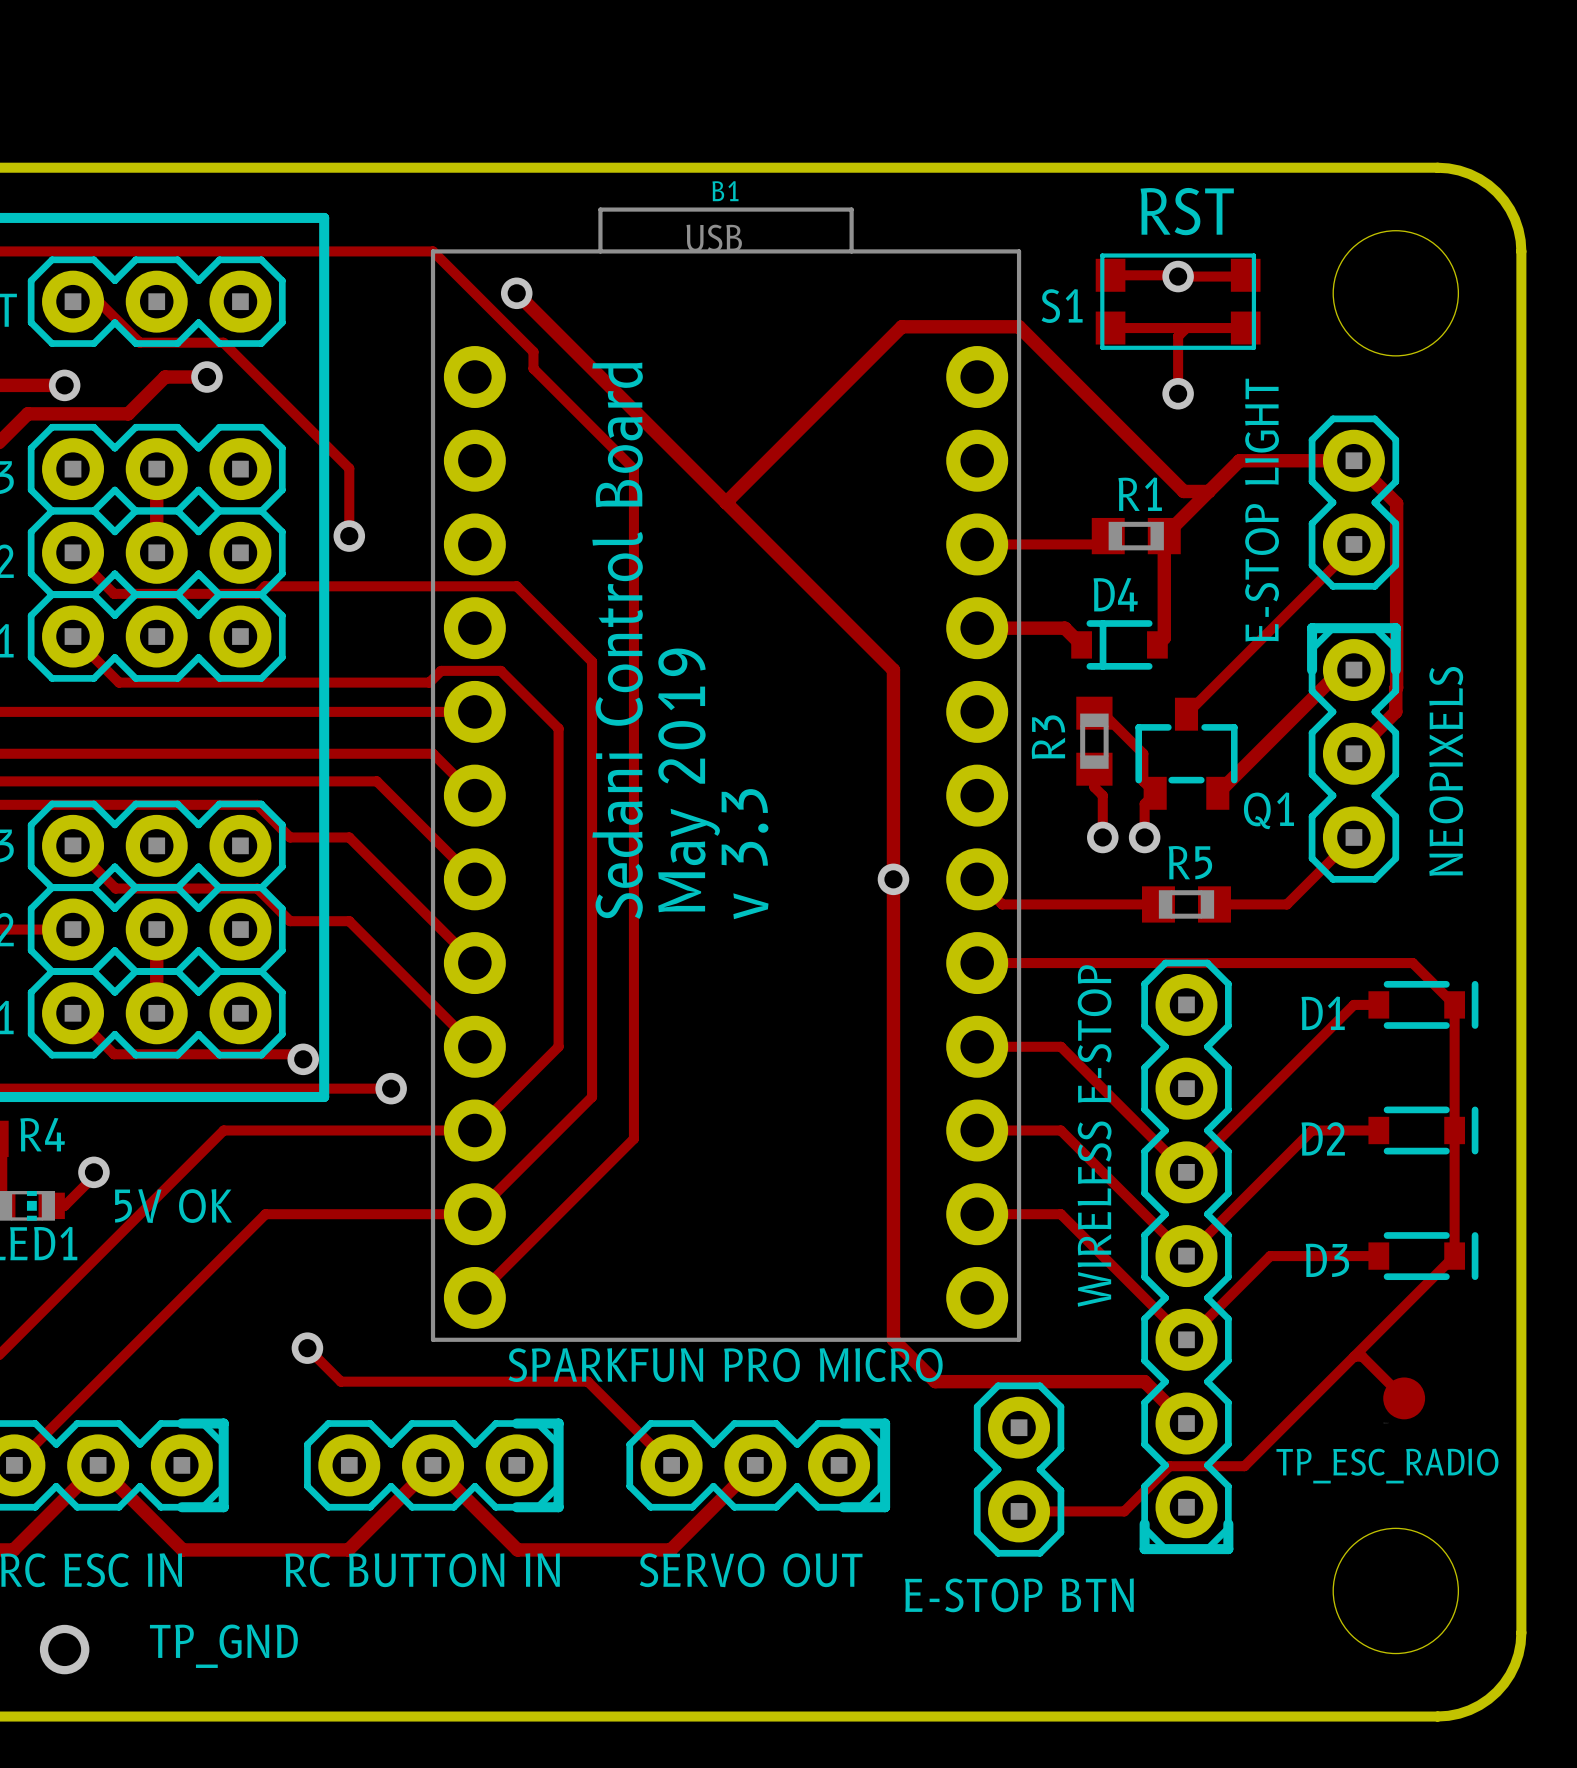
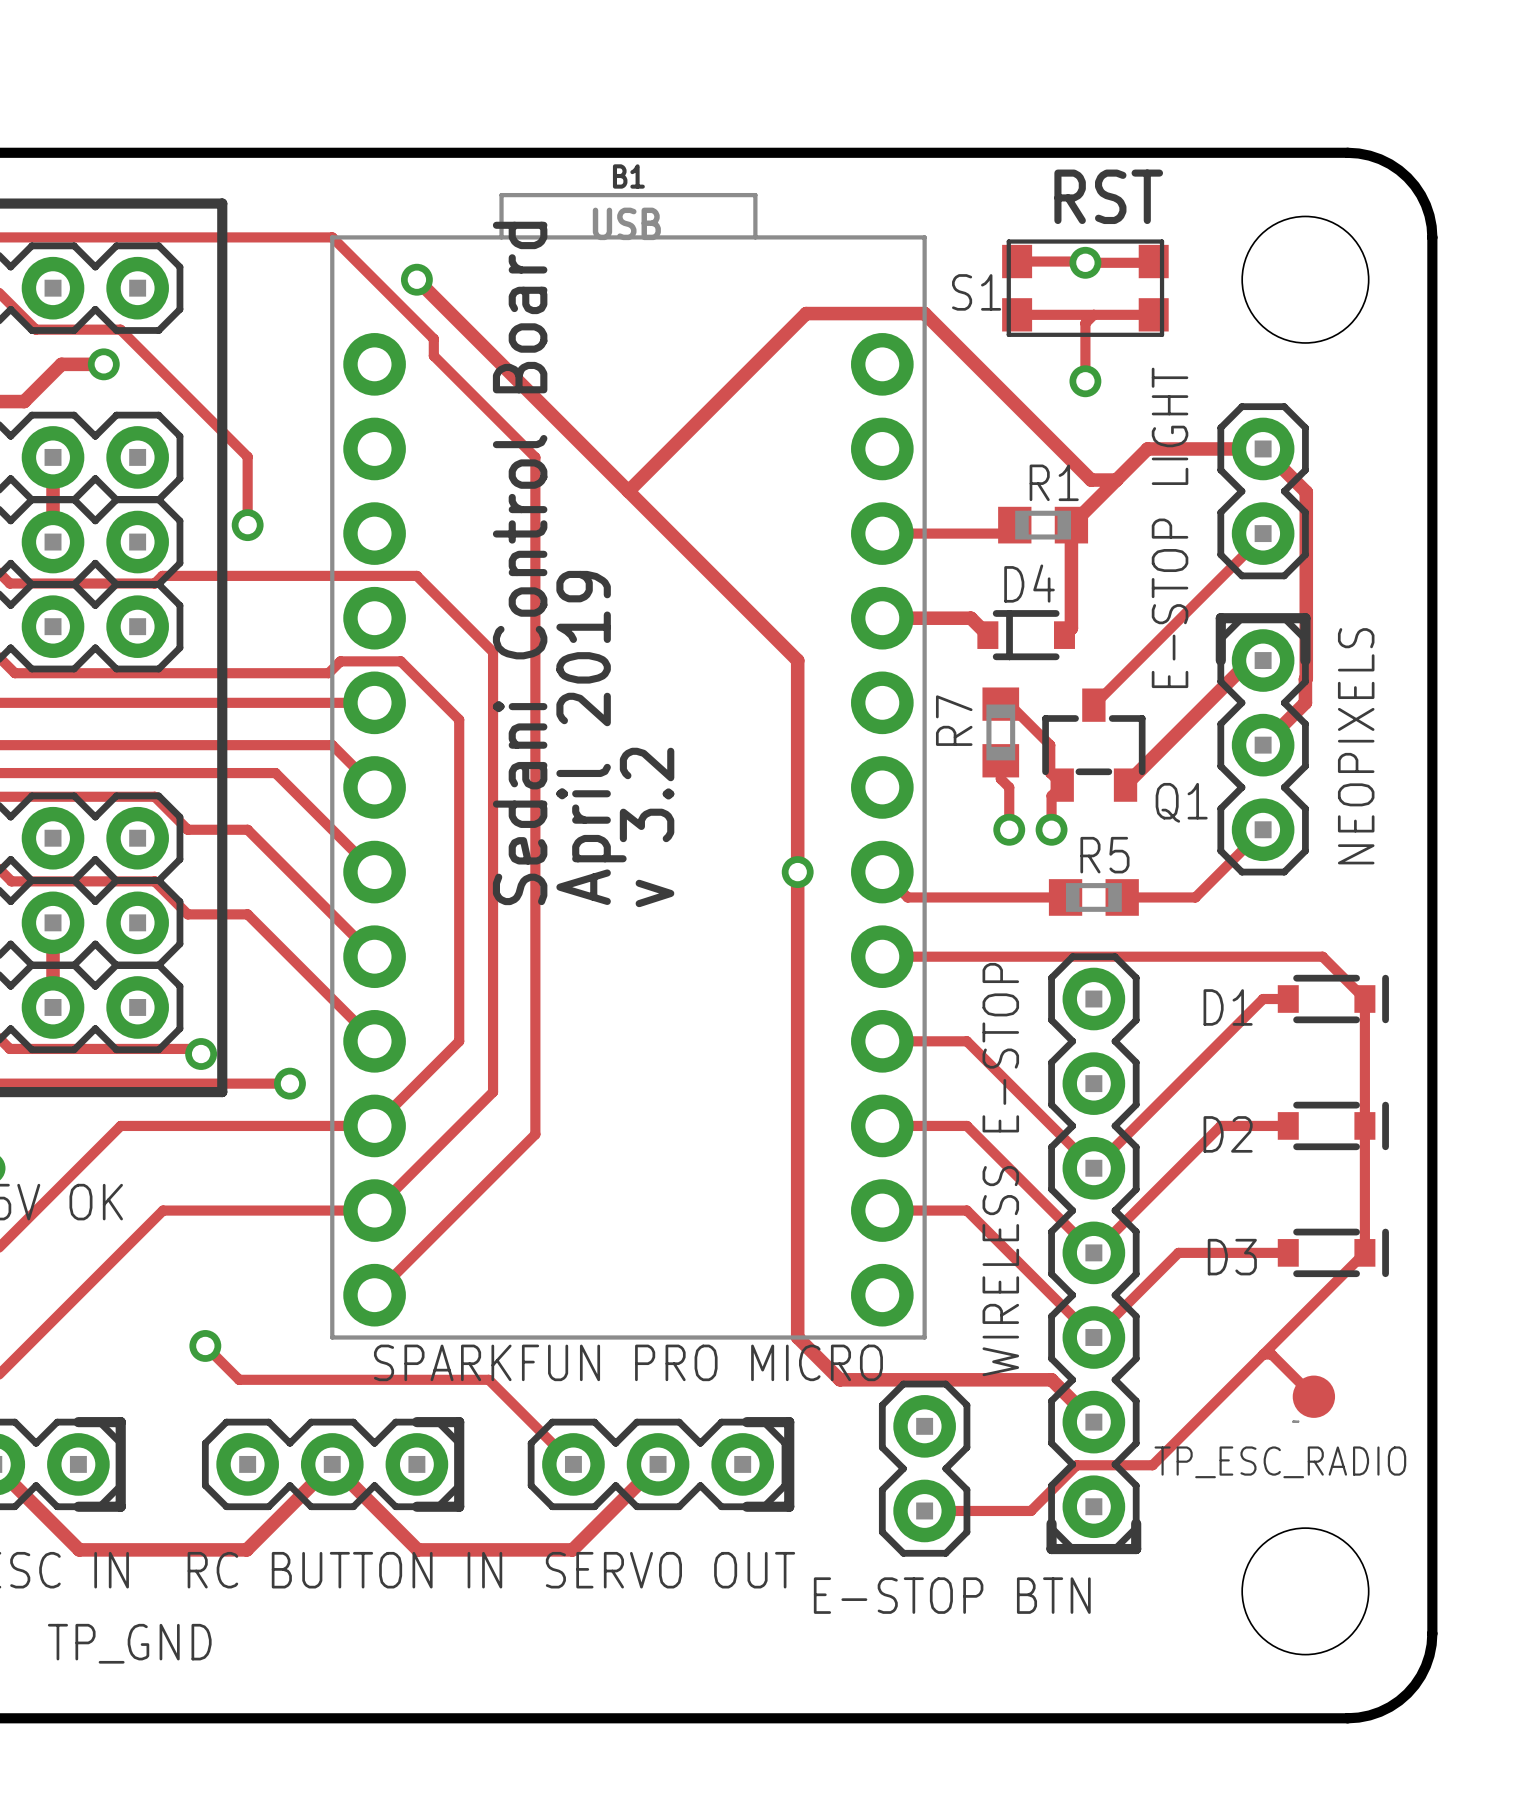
R3 name: R3 (1048, 737) -> R7 (954, 720)
text: May 2019 (689, 780) -> April 2019 (591, 737)
text: v 3.3 (745, 854) -> v 3.2 (647, 827)

